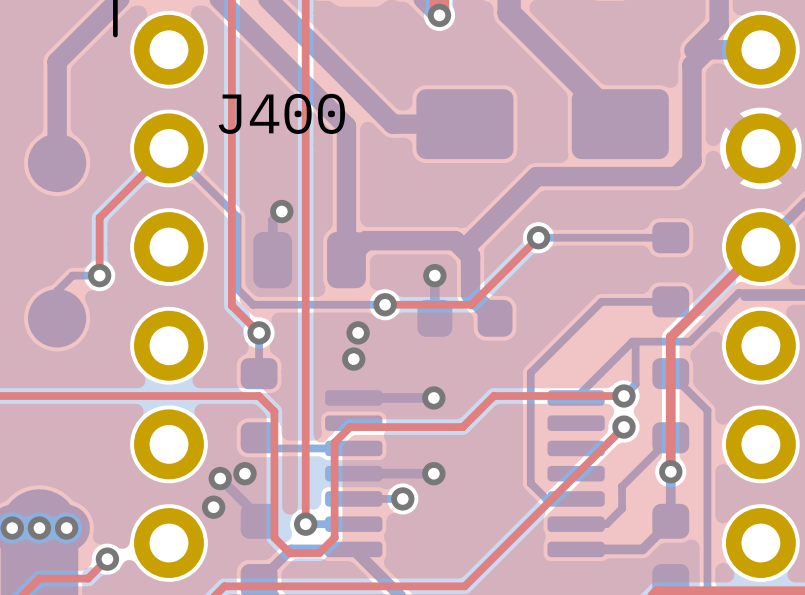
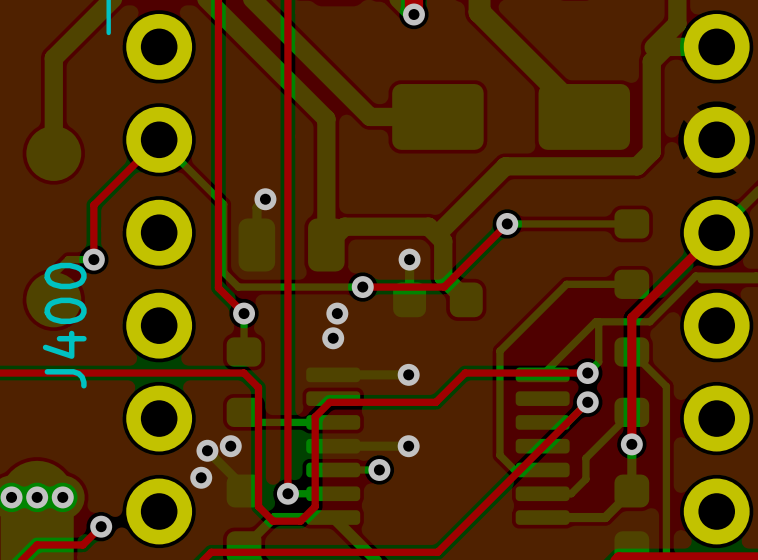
J400 name rotation: 0° (281, 113) -> 90° counterclockwise (64, 325)
J400 name position: J400 (281, 113) -> J400 (64, 325)

